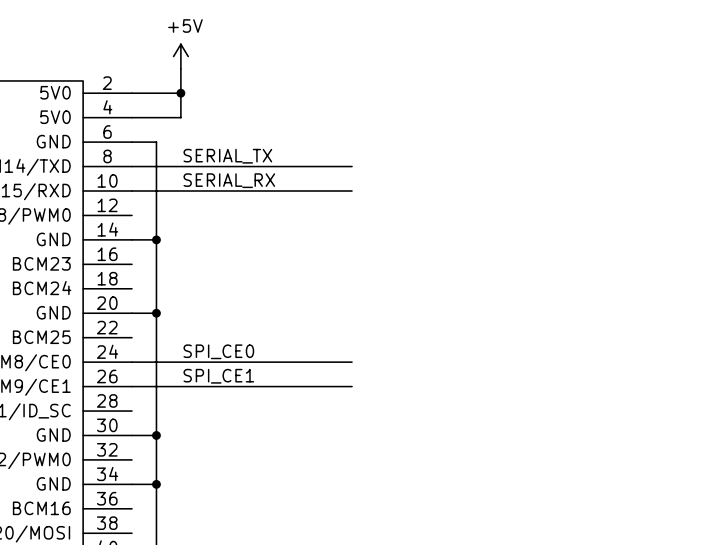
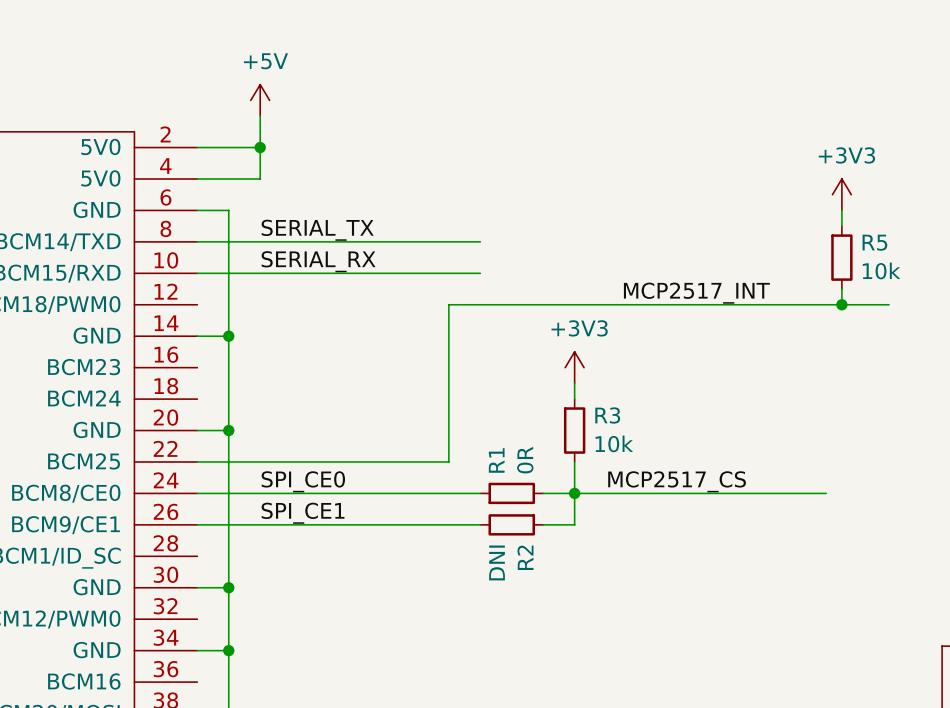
power symbol: none -> +3V3 (841, 194)
wire: none -> (841, 210) (841, 226)
R5: none -> 10k (841, 257)
wire: none -> (841, 289) (841, 304)
label: none -> MCP2517_INT (696, 293)
junction: none -> (841, 304)
wire: none -> (889, 304) (448, 304) (448, 461) (197, 461)
power symbol: none -> +3V3 (574, 367)
wire: none -> (574, 383) (574, 399)
R3: none -> 10k (574, 430)
wire: none -> (574, 461) (574, 524) (543, 524)
label: none -> MCP2517_CS (677, 481)
R1: none -> 0R (511, 493)
wire: none -> (543, 493) (826, 493)
junction: none -> (574, 493)
R2: none -> DNI (511, 524)

